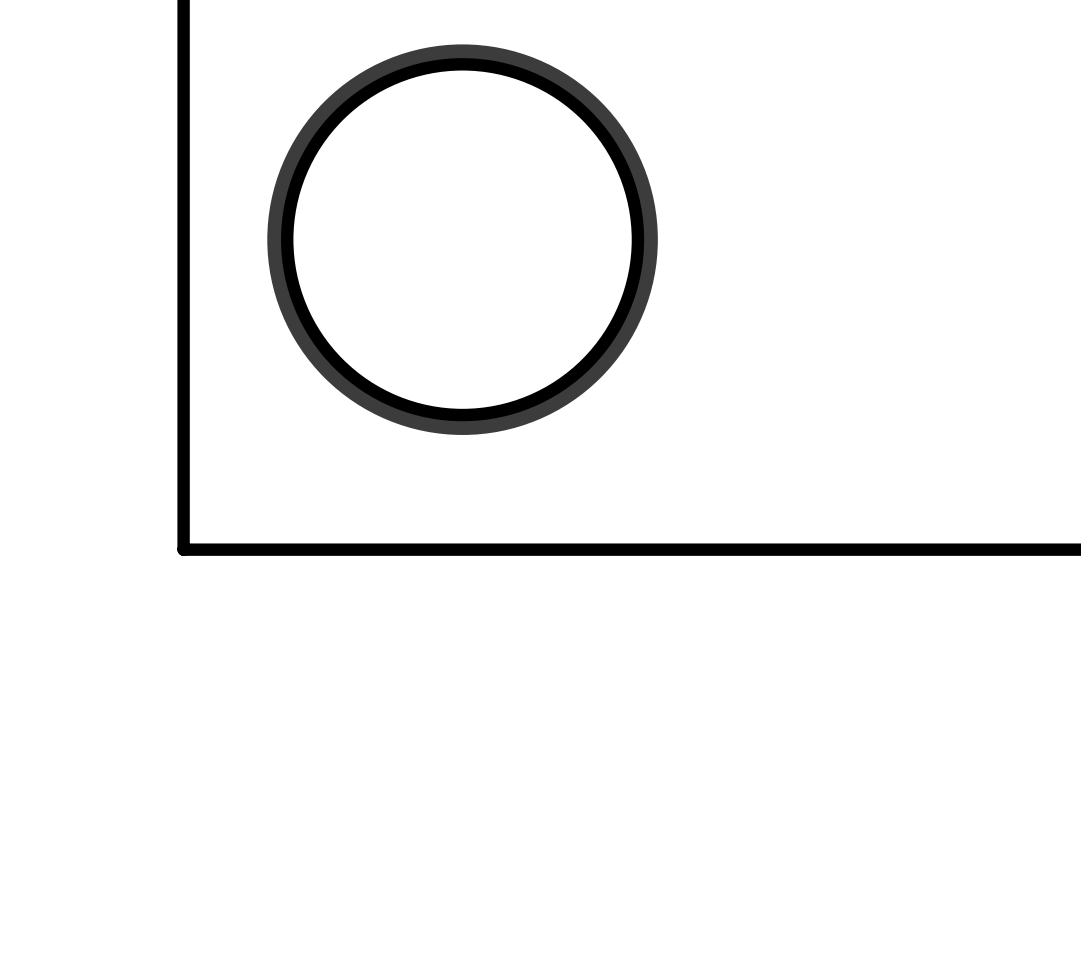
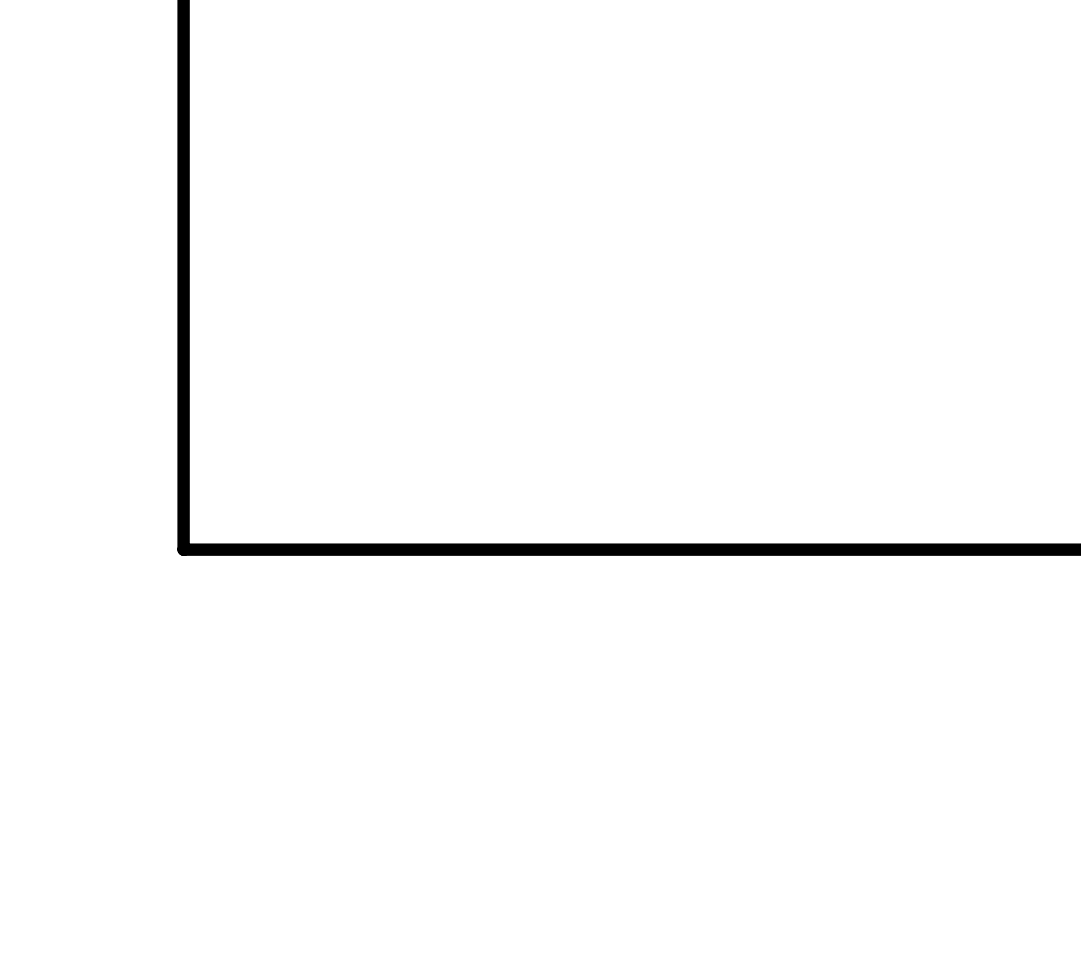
drawing: [267, 44, 658, 435] -> none
round board edge: [281, 58, 645, 422] -> none

